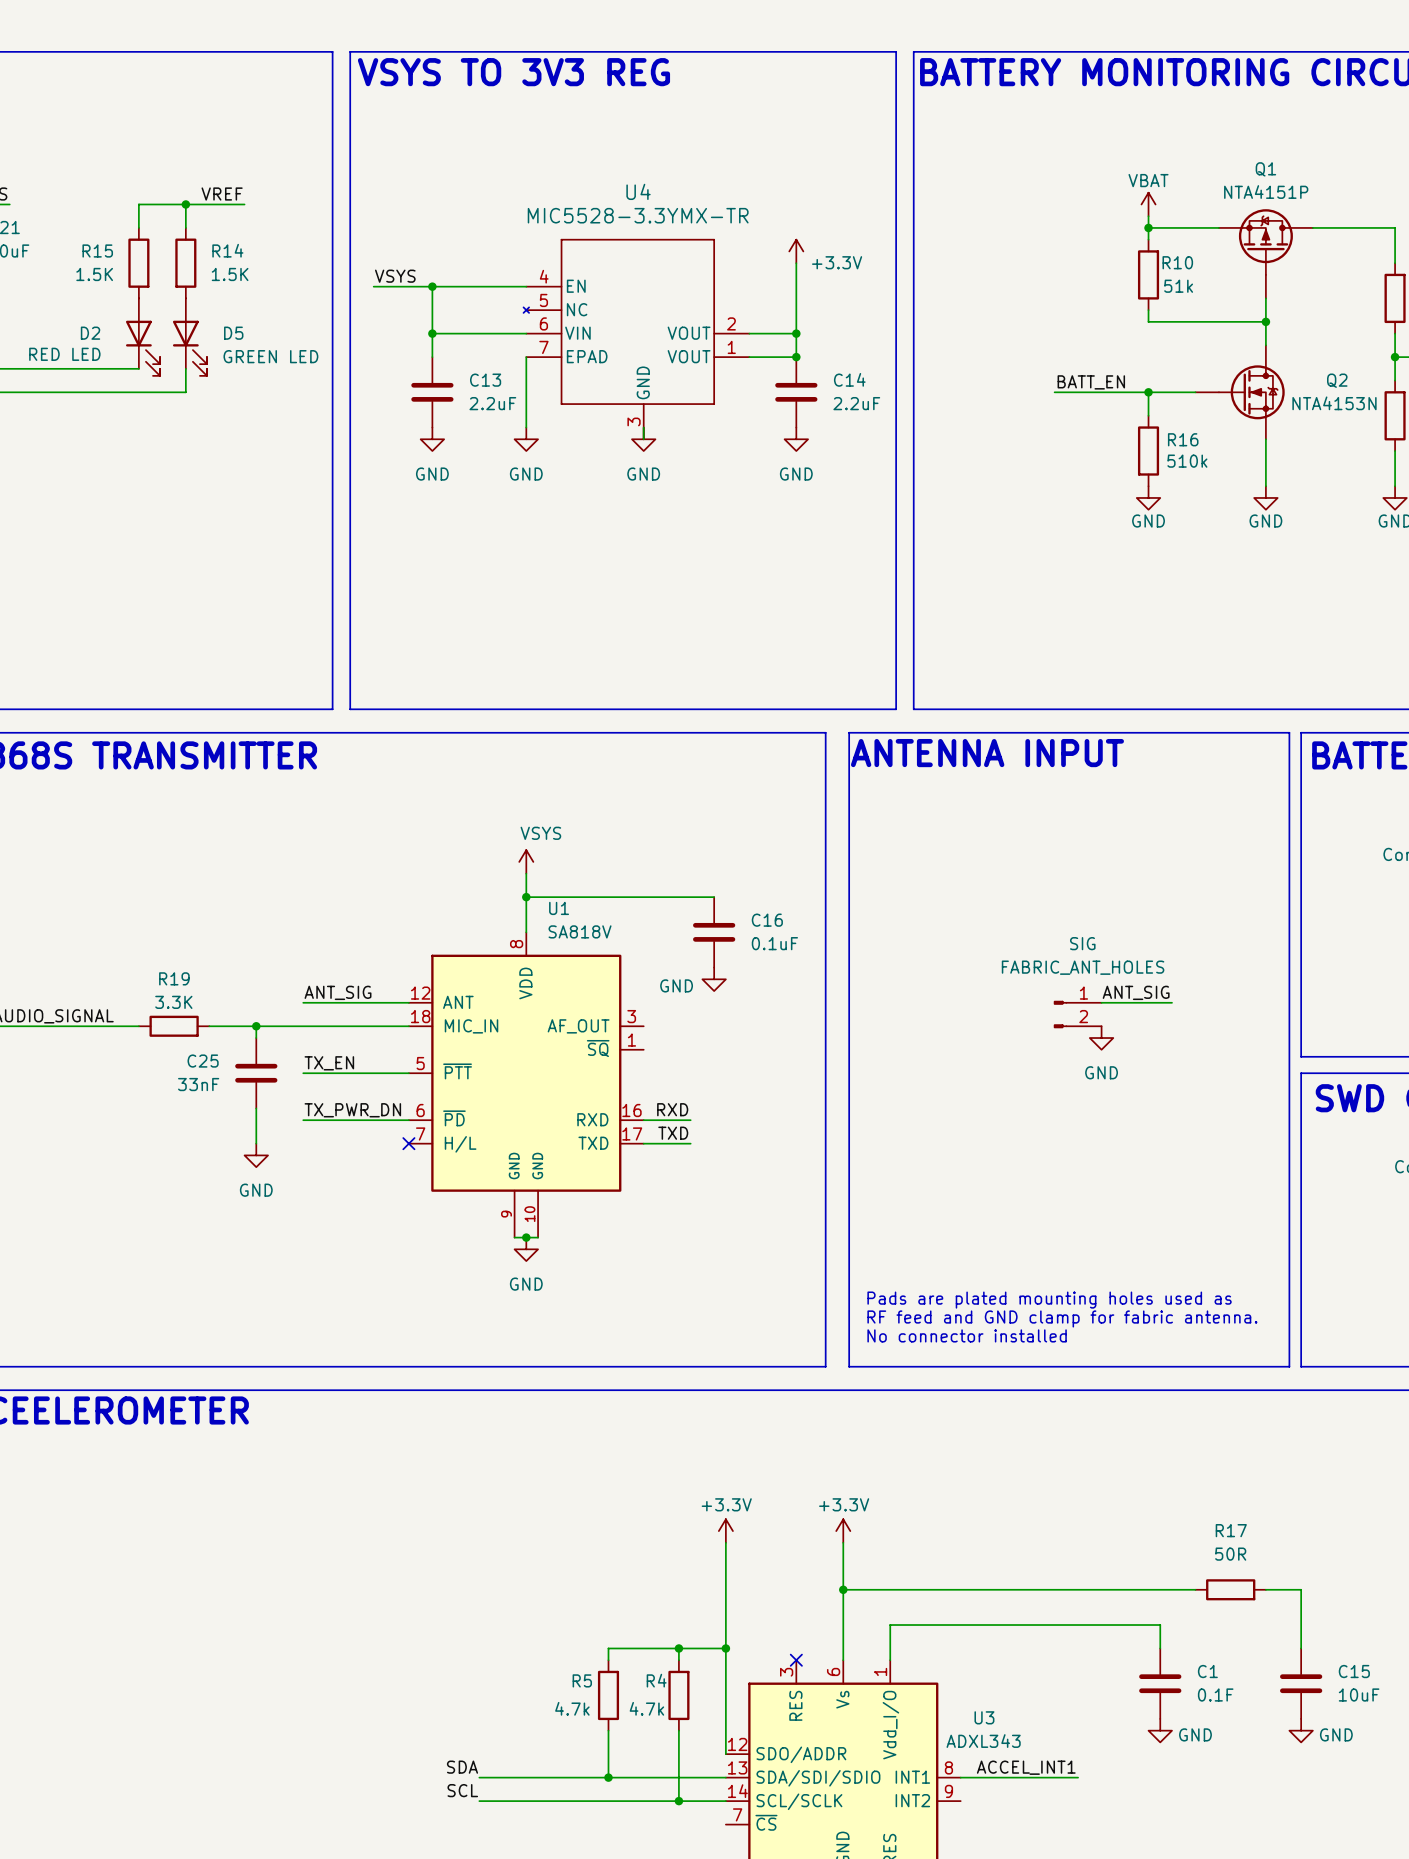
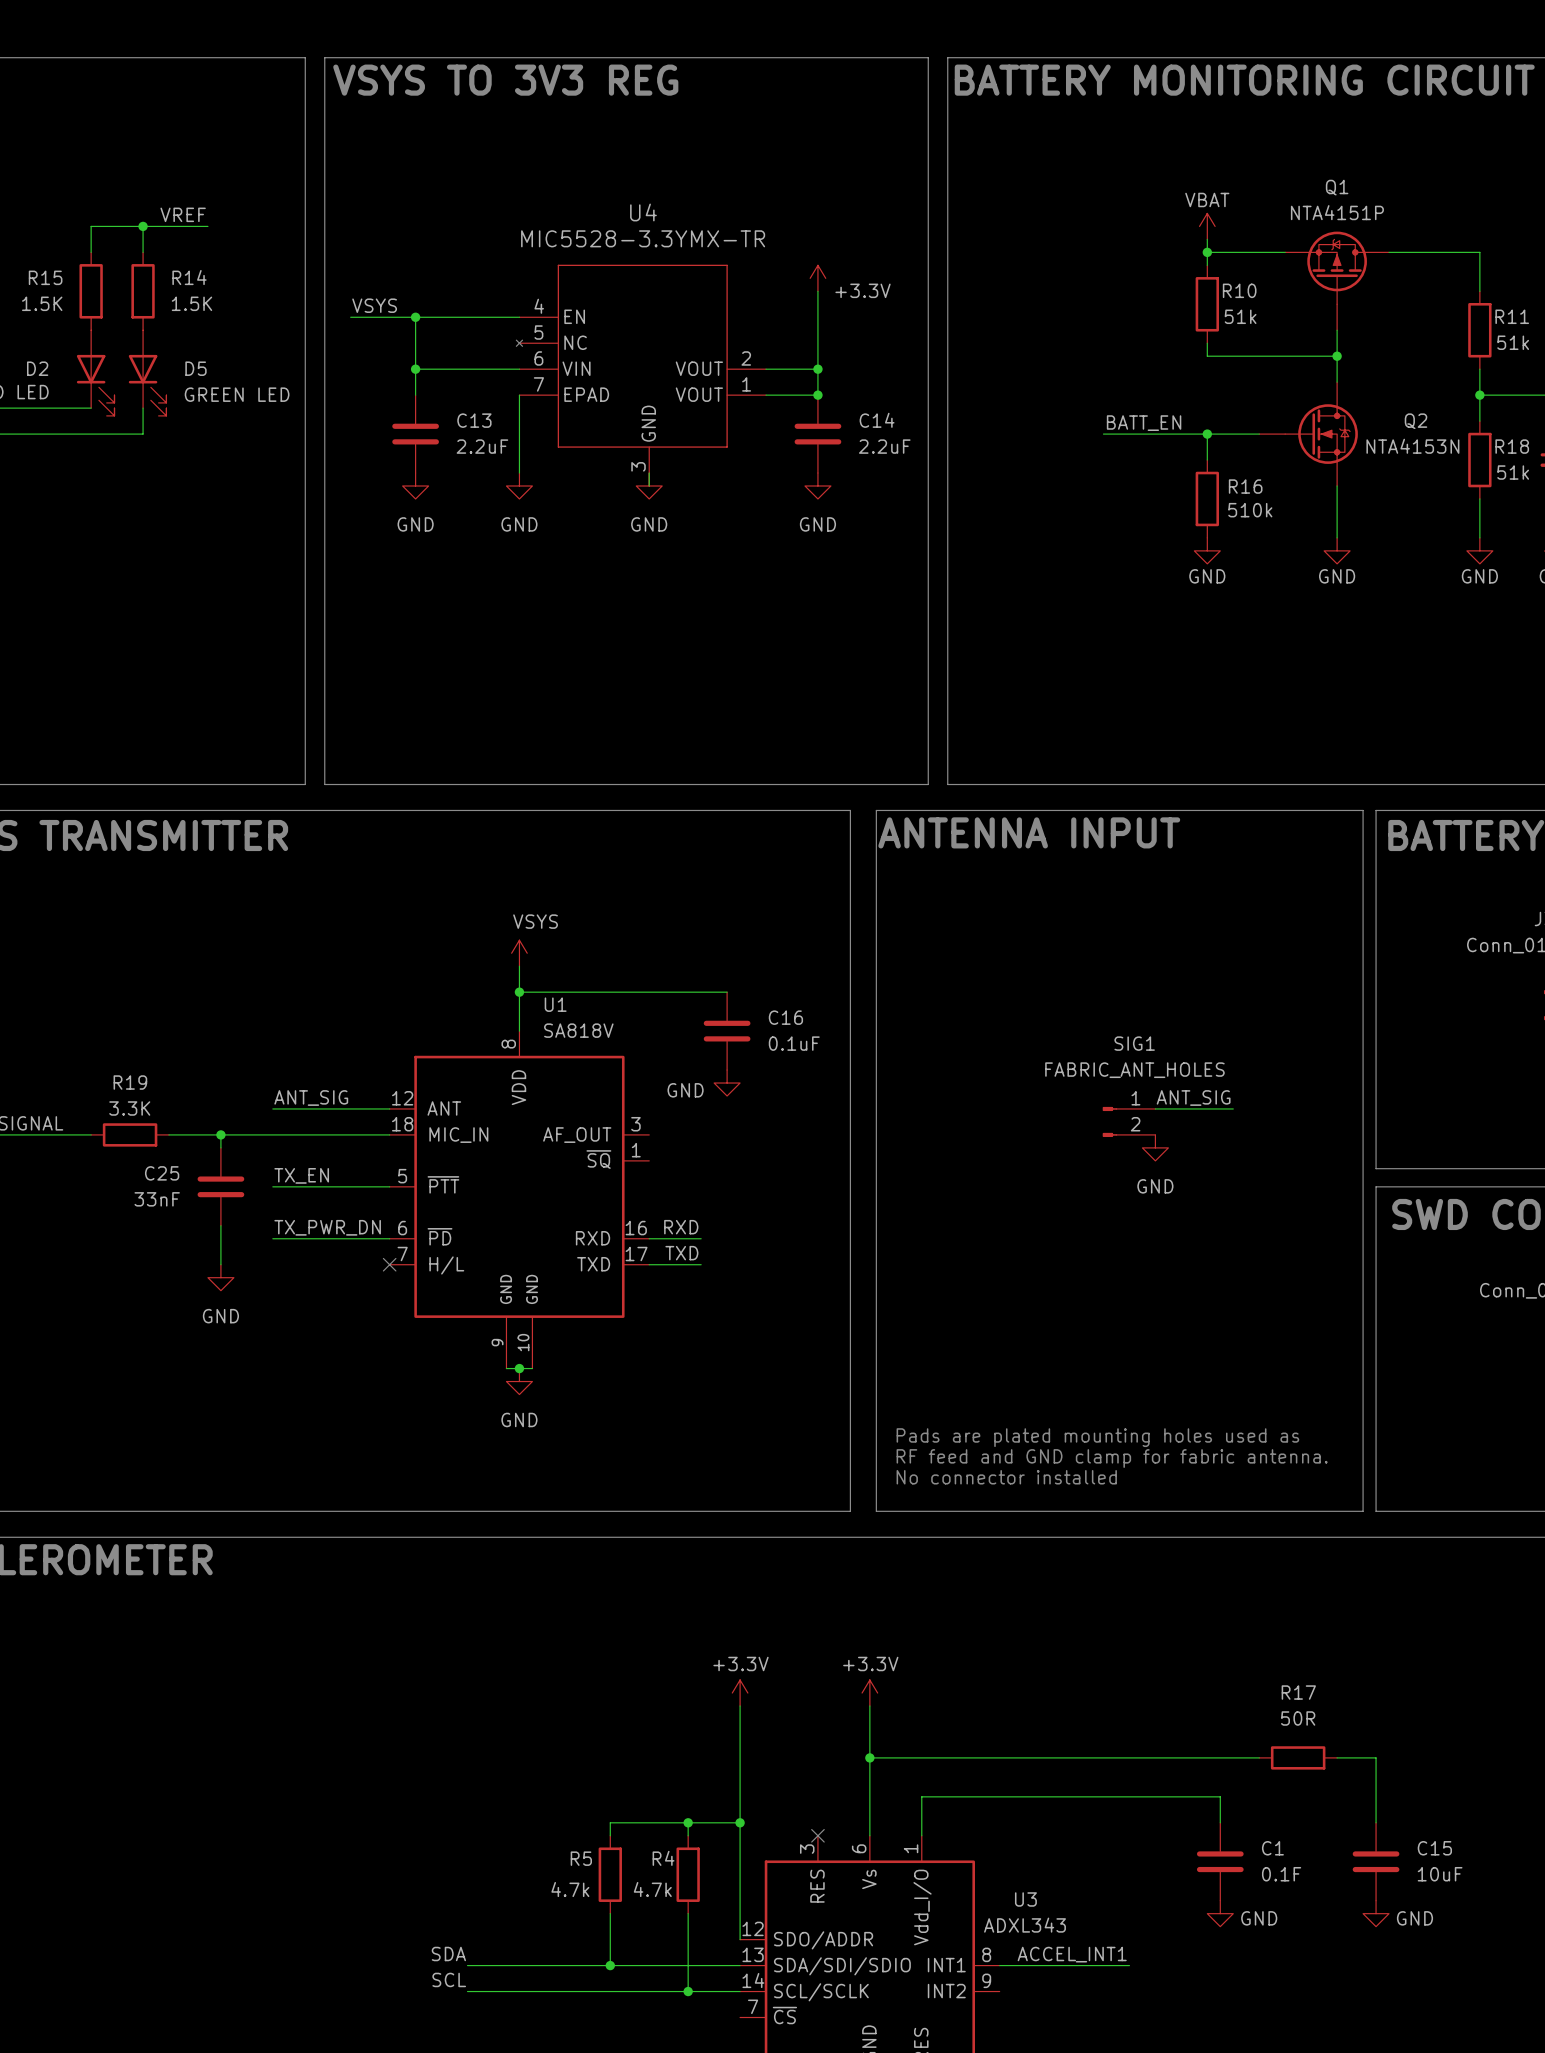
SIG name: SIG (1082, 943) -> SIG1 (1134, 1043)

